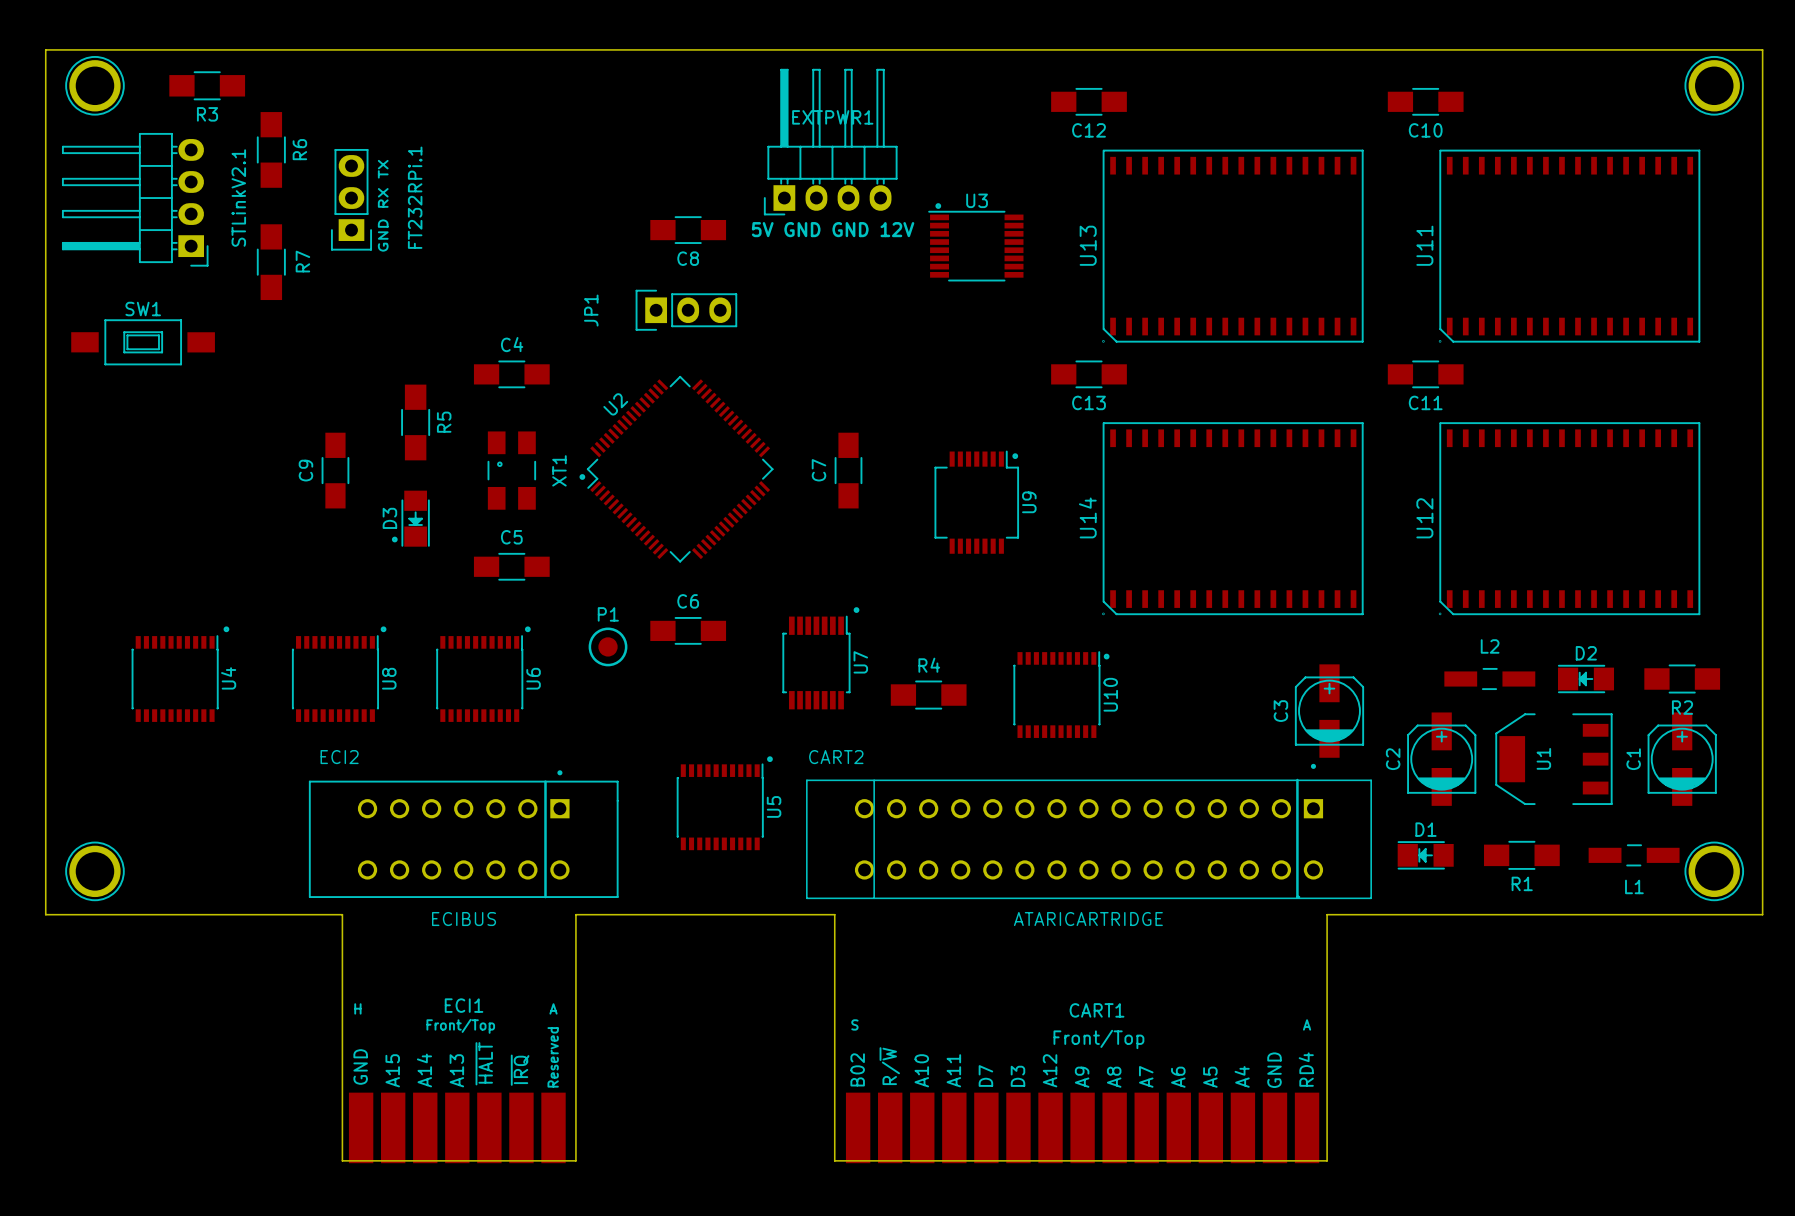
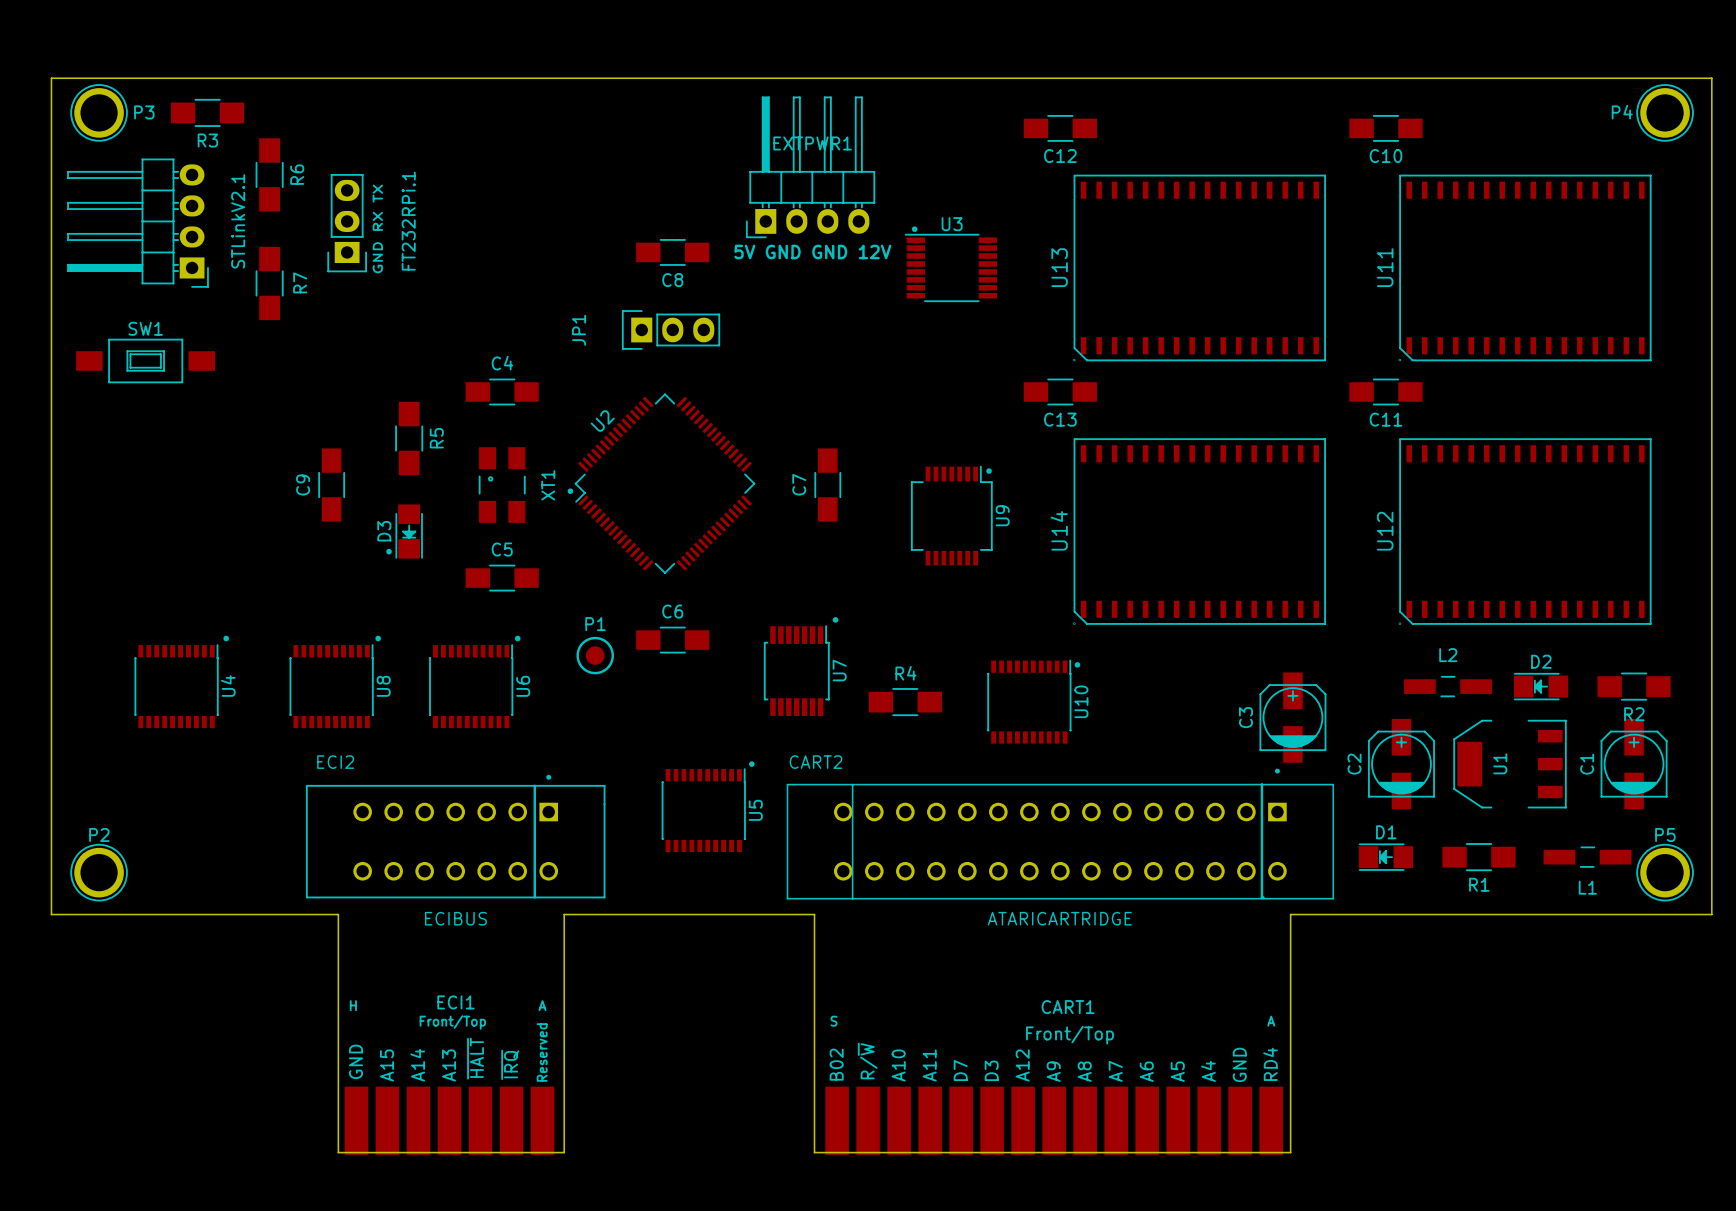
P3 name: none -> P3 (144, 112)
P4 name: none -> P4 (1622, 112)
P2 name: none -> P2 (99, 834)
P5 name: none -> P5 (1665, 834)

